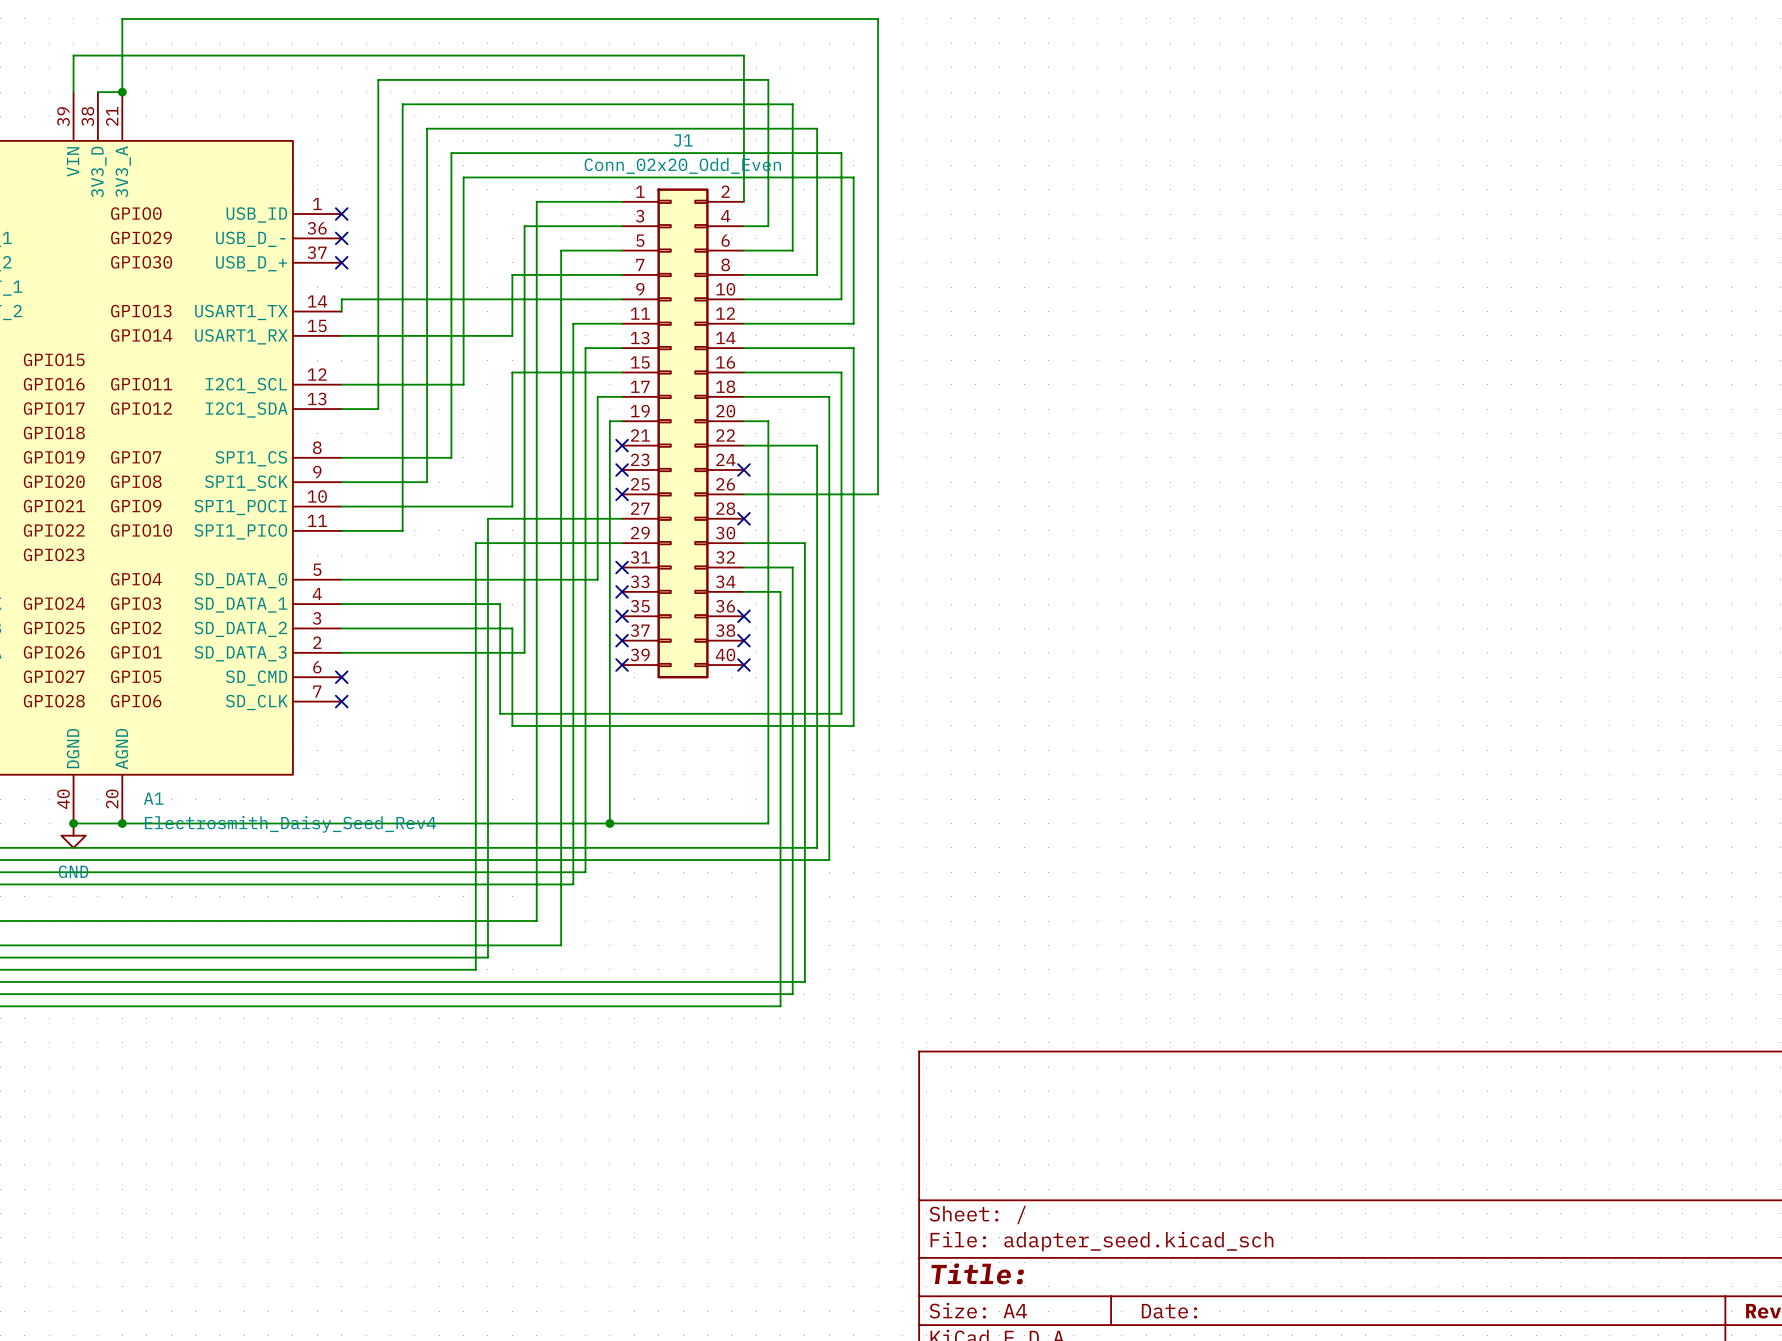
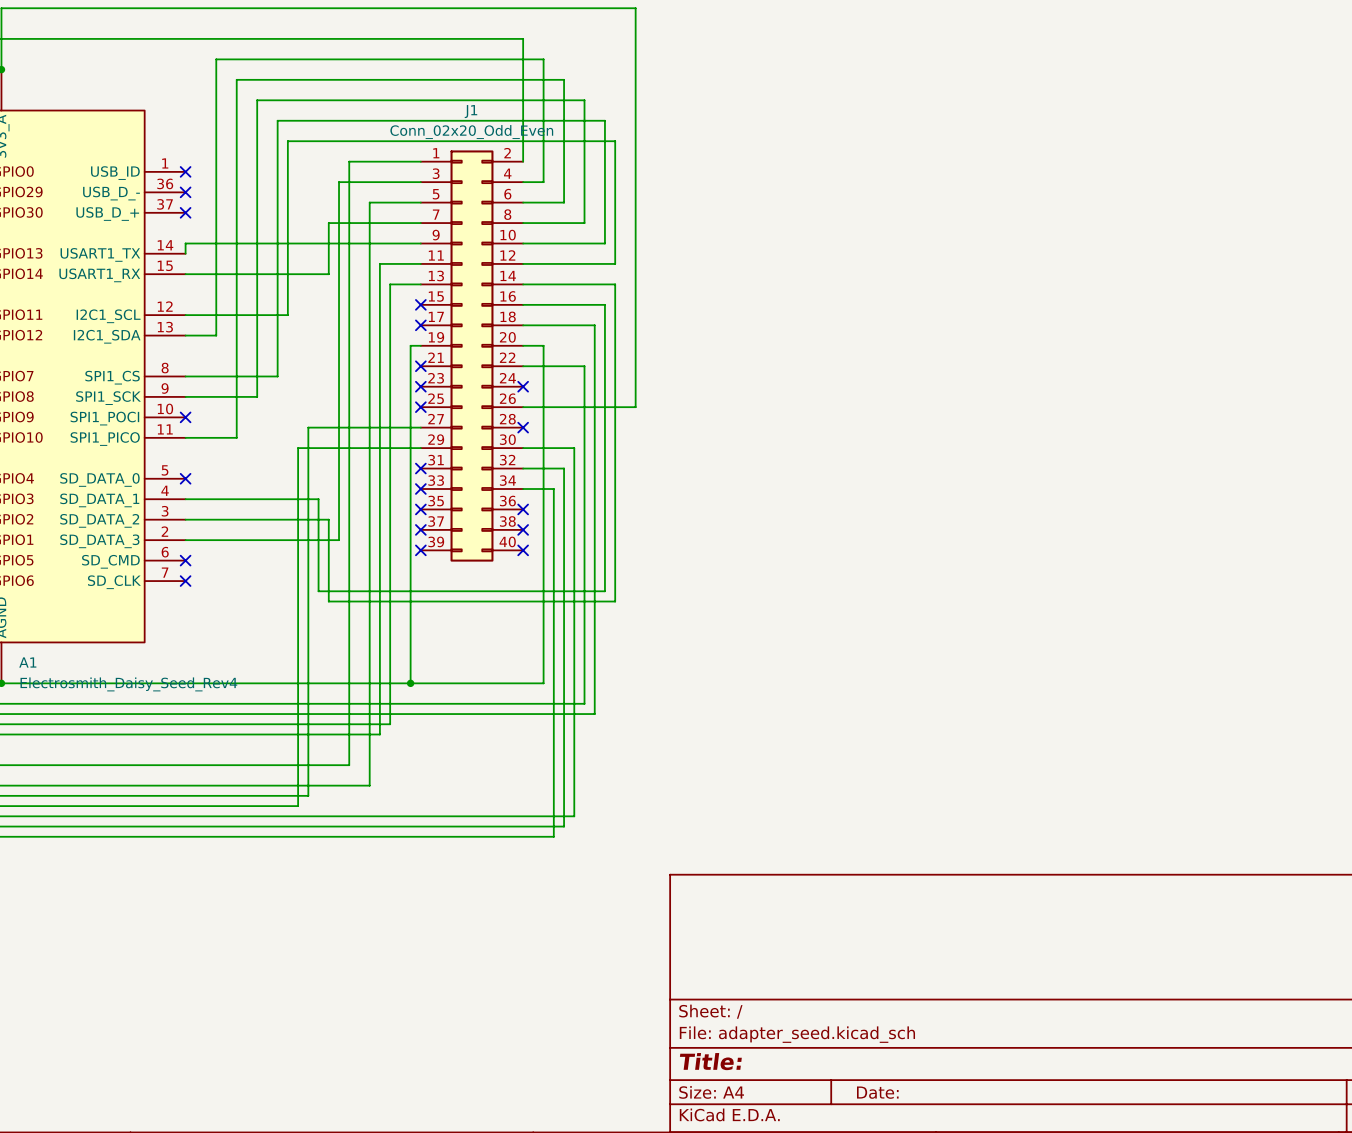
wire: (622, 372) (512, 372) (512, 506) (341, 506) -> none
no-connect mark: none -> (420, 304)
wire: (622, 396) (597, 396) (597, 579) (341, 579) -> none
no-connect mark: none -> (420, 325)
no-connect mark: none -> (185, 417)
no-connect mark: none -> (185, 478)

